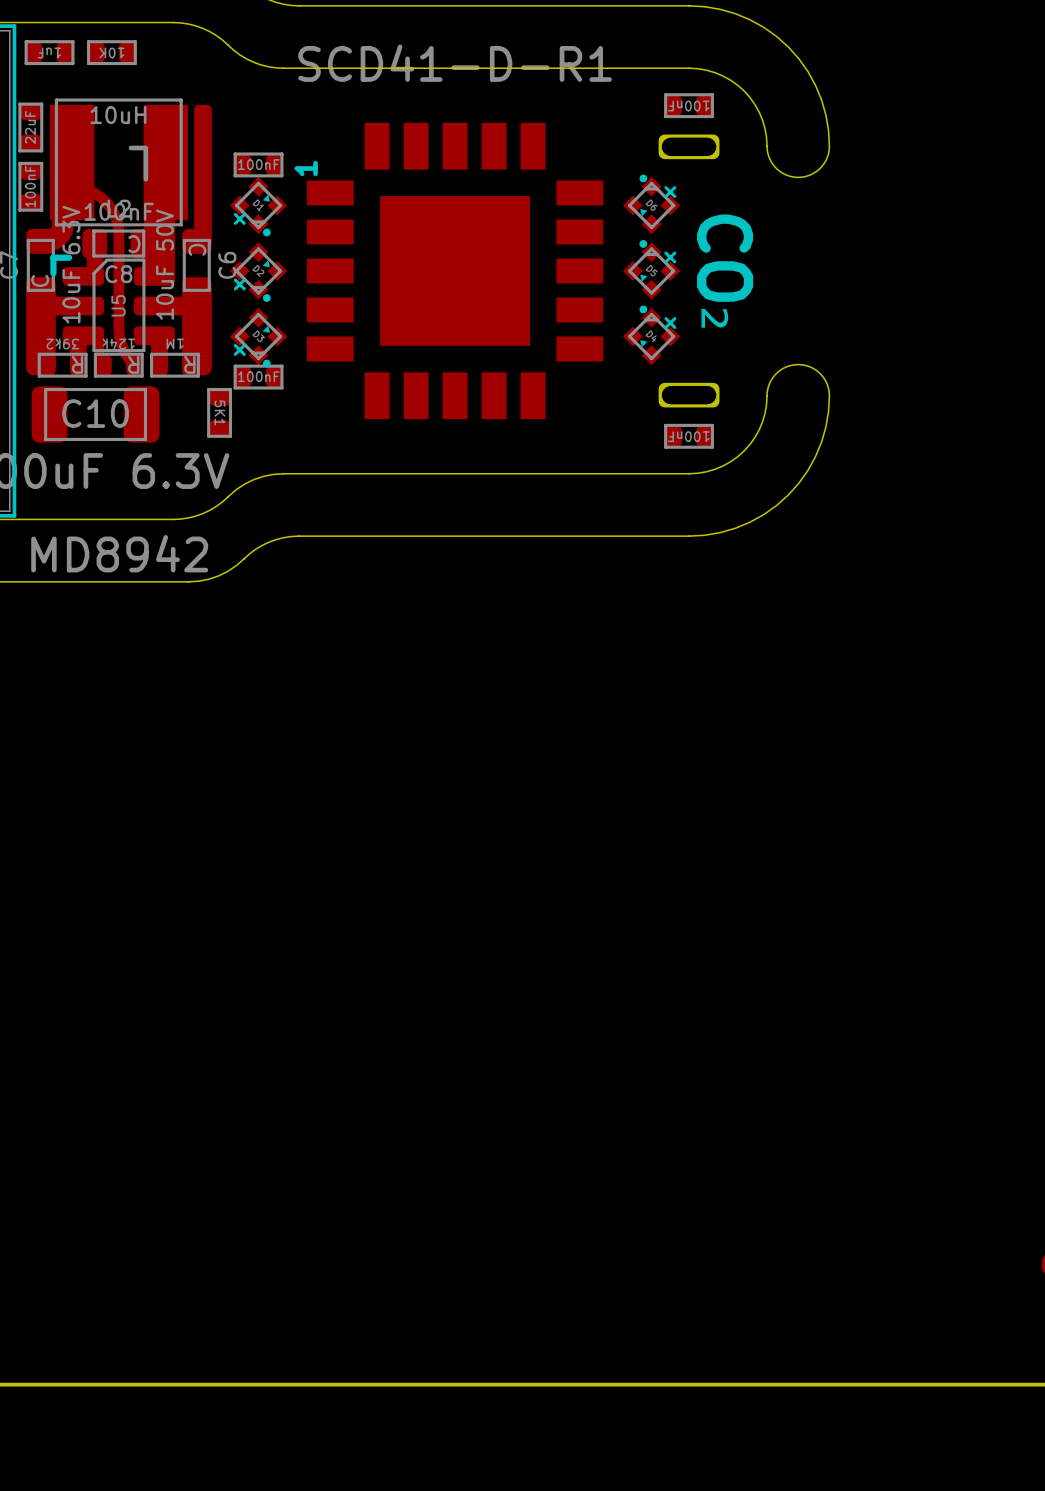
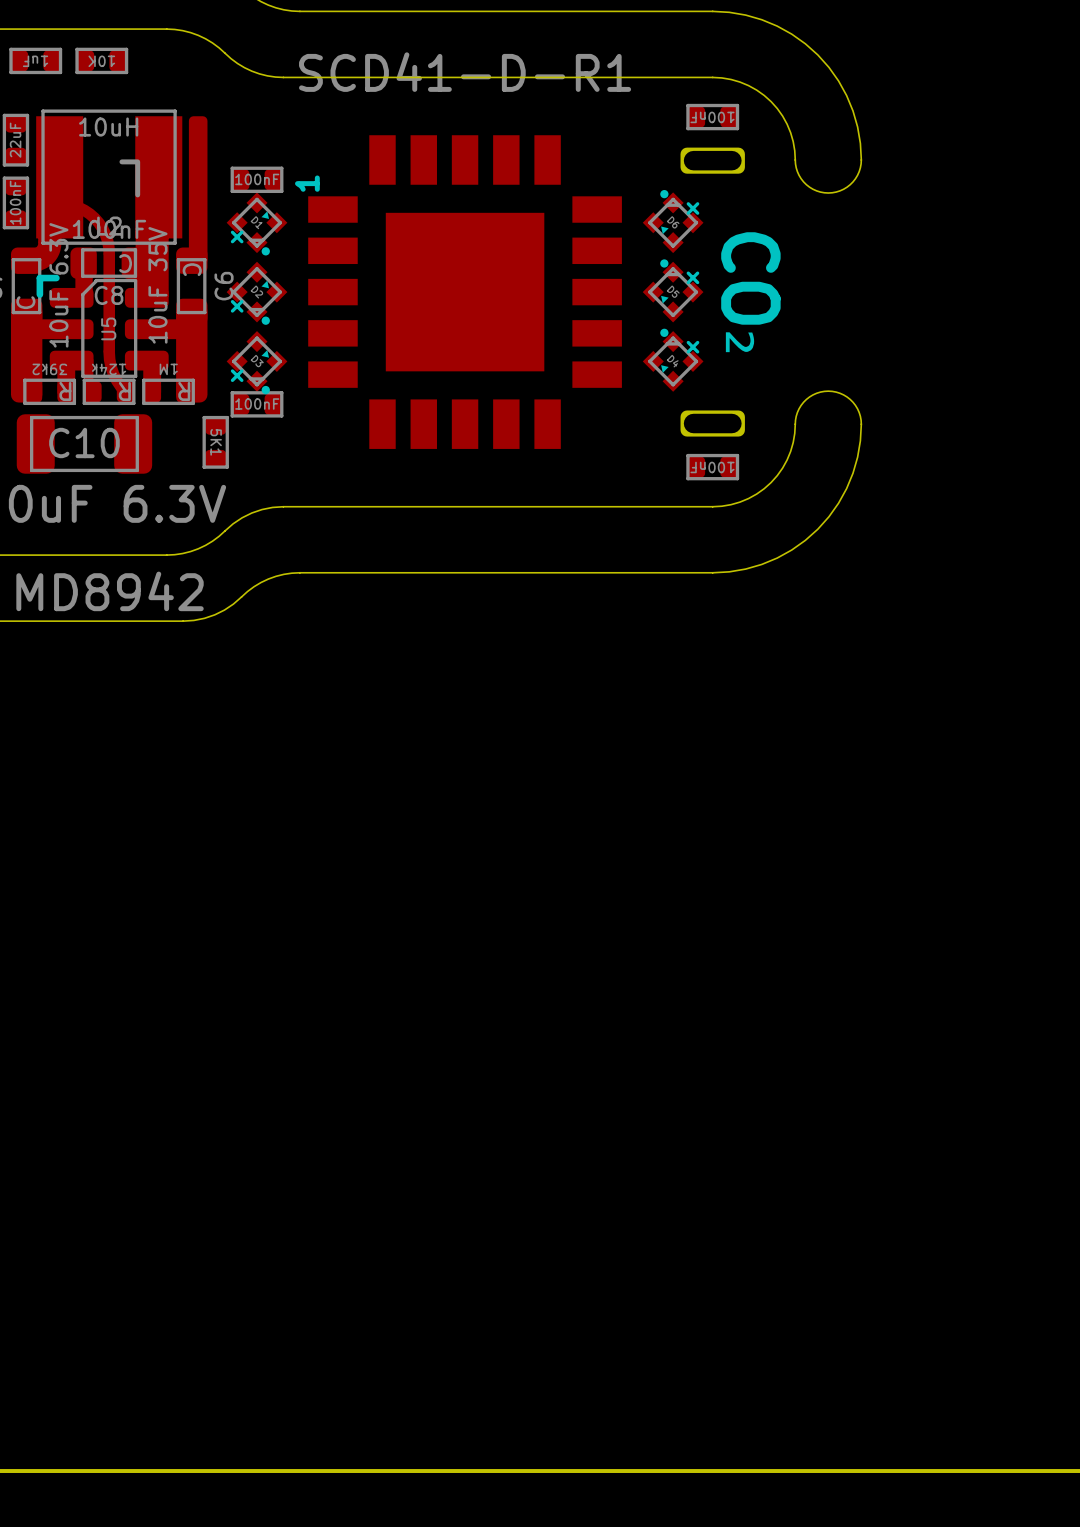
C6 value: 10uF 50V (165, 264) -> 10uF 35V (157, 285)

